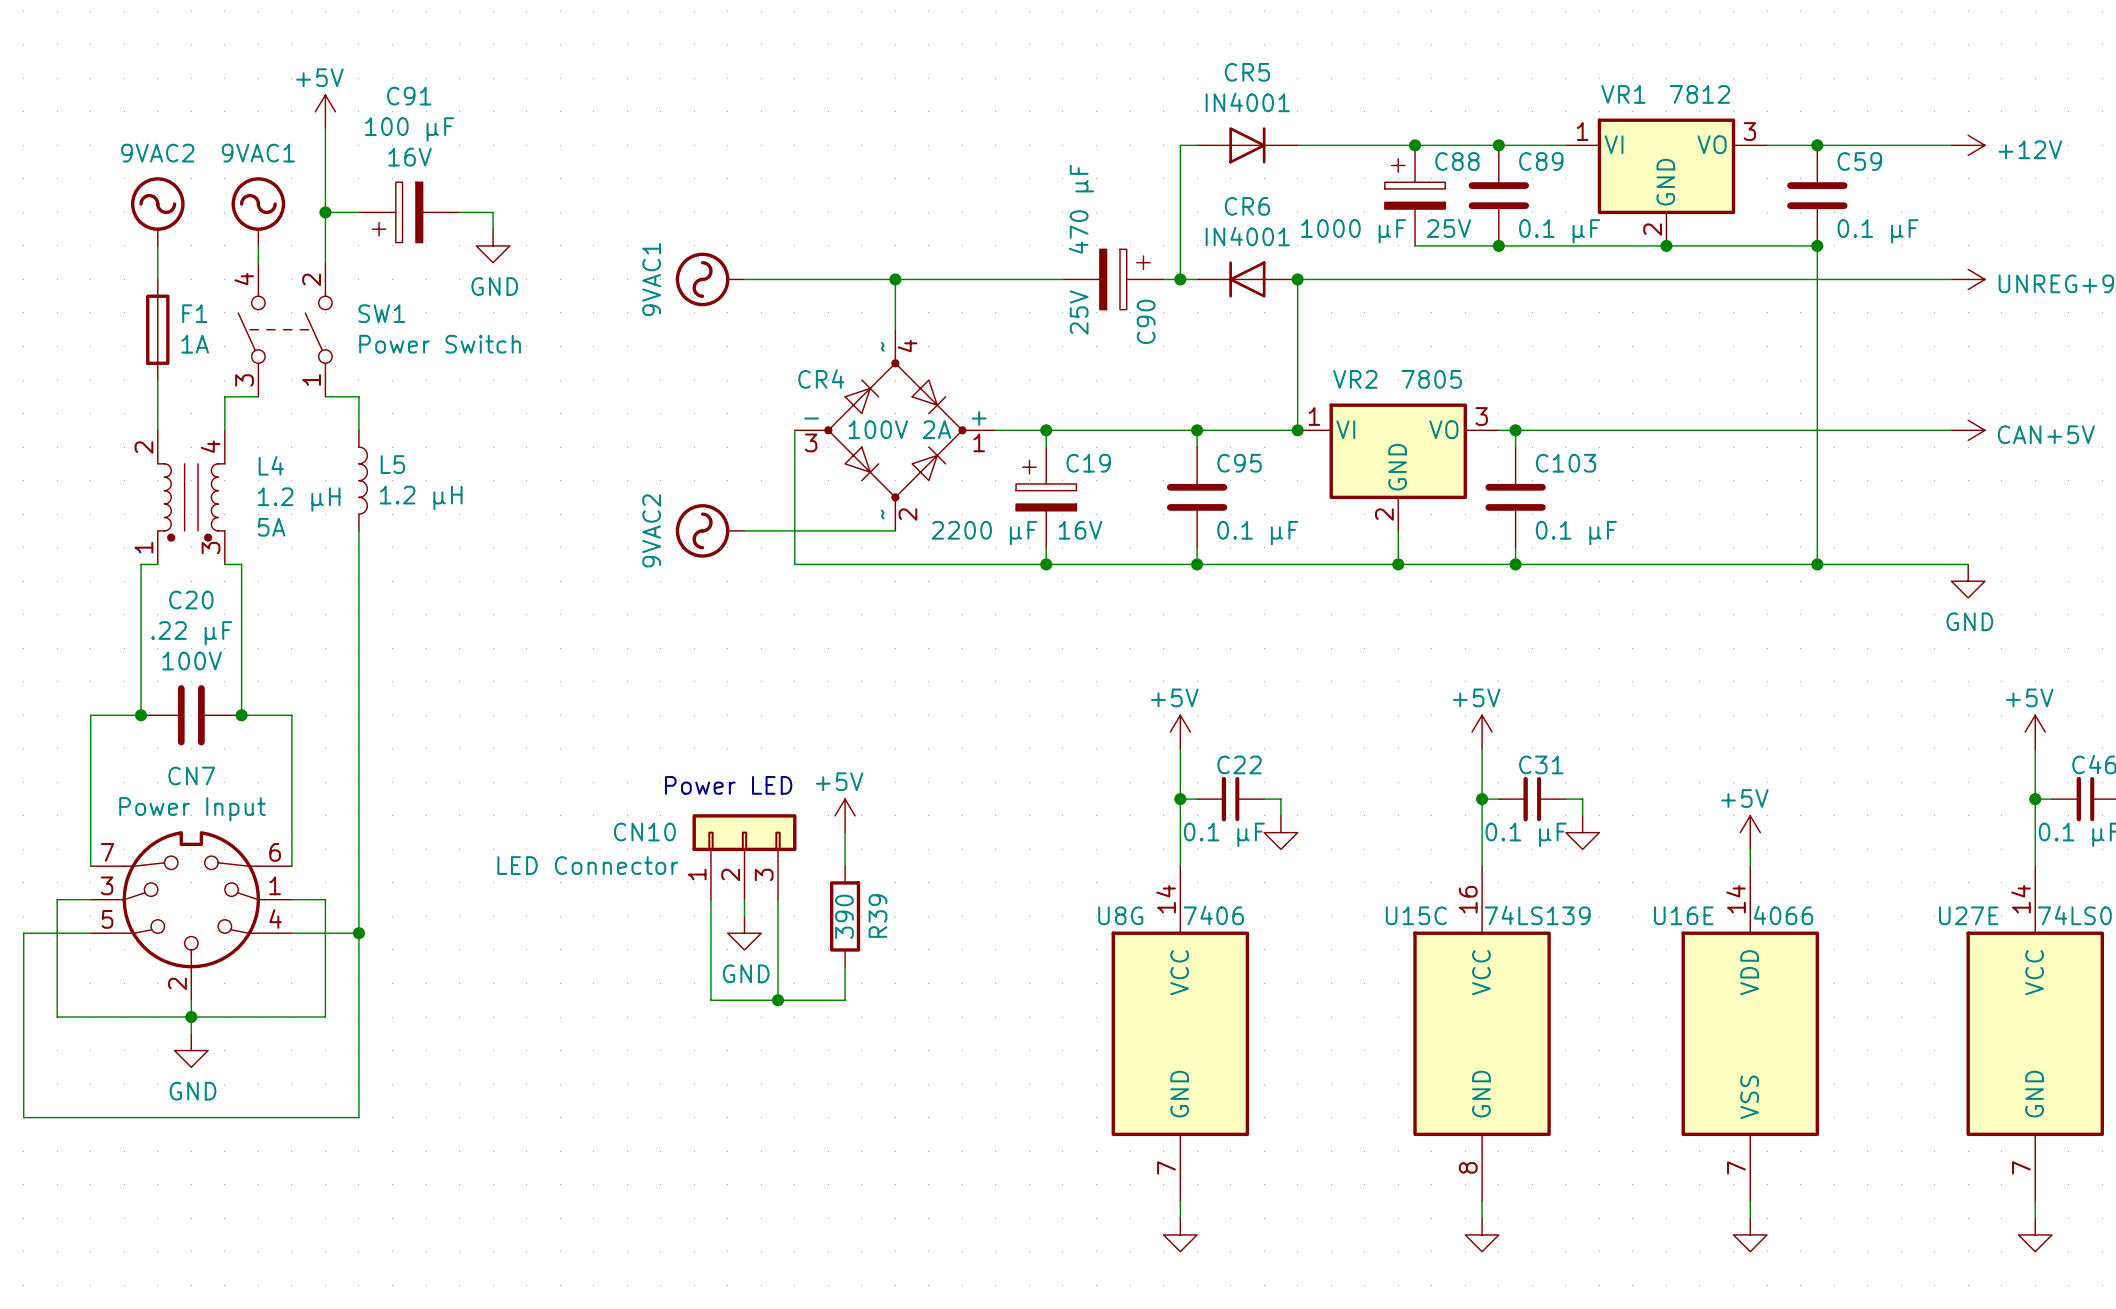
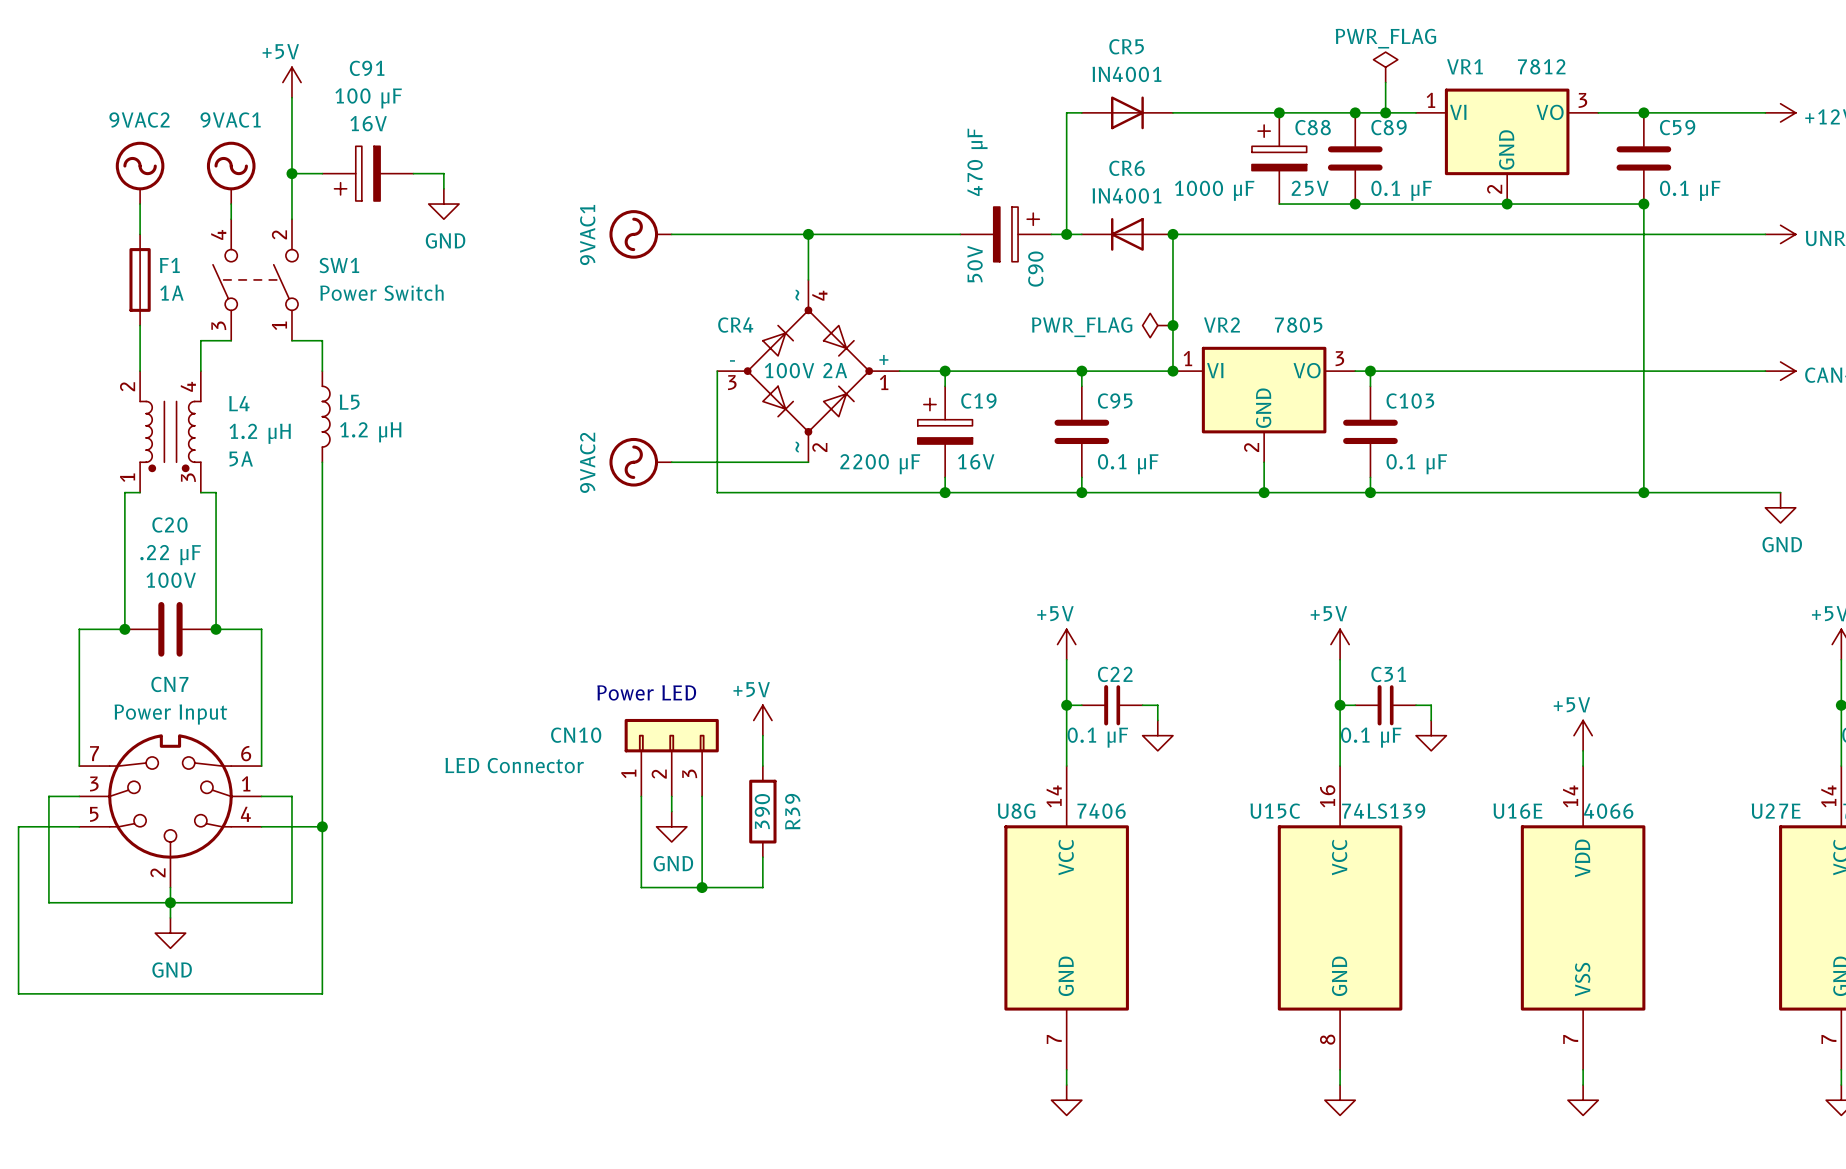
power symbol: none -> PWR_FLAG (1385, 67)
wire: none -> (1385, 82) (1385, 112)
junction: none -> (1385, 112)
C90 text: 25V (1079, 312) -> 50V (975, 264)
power symbol: none -> PWR_FLAG (1157, 325)
junction: none -> (1172, 325)

